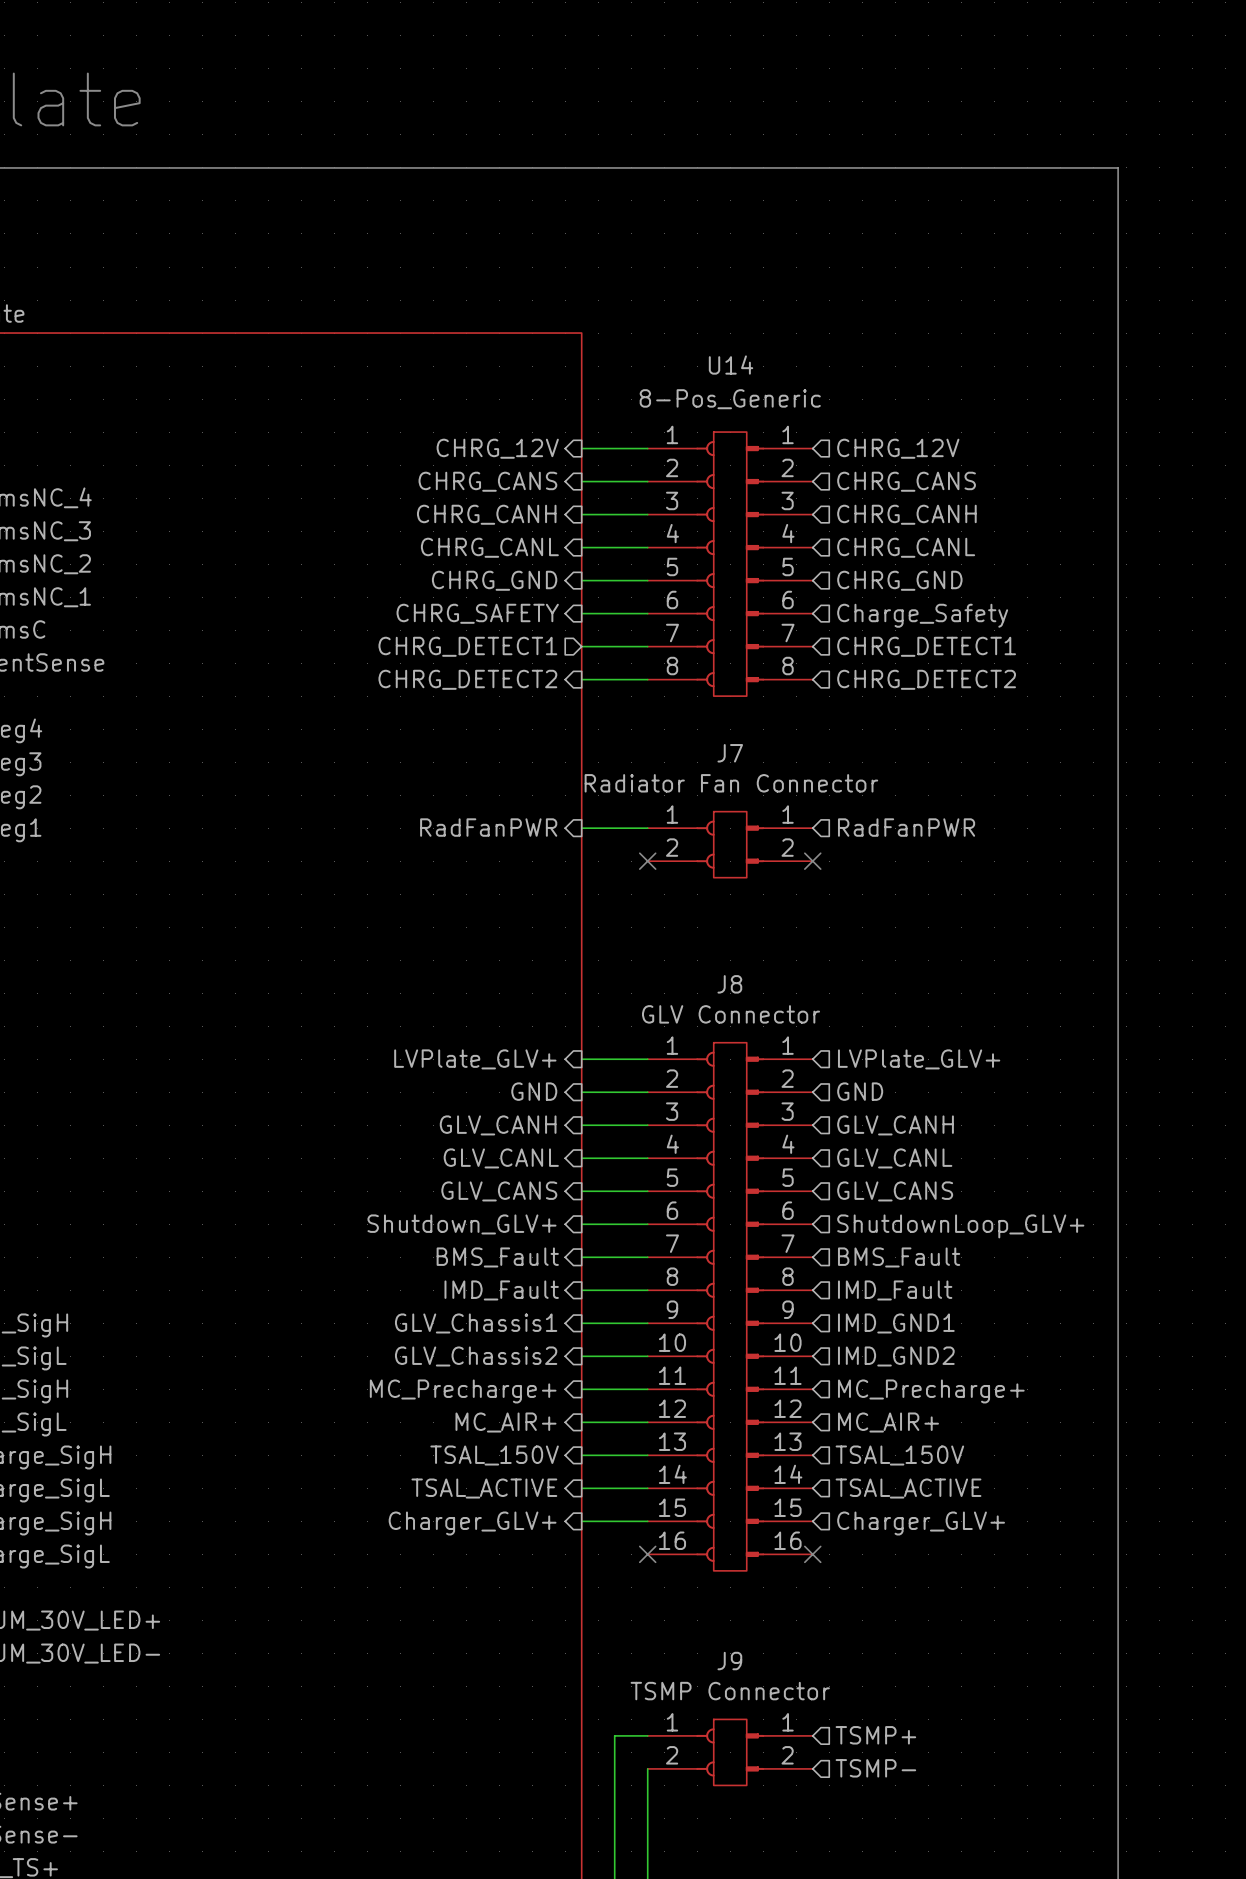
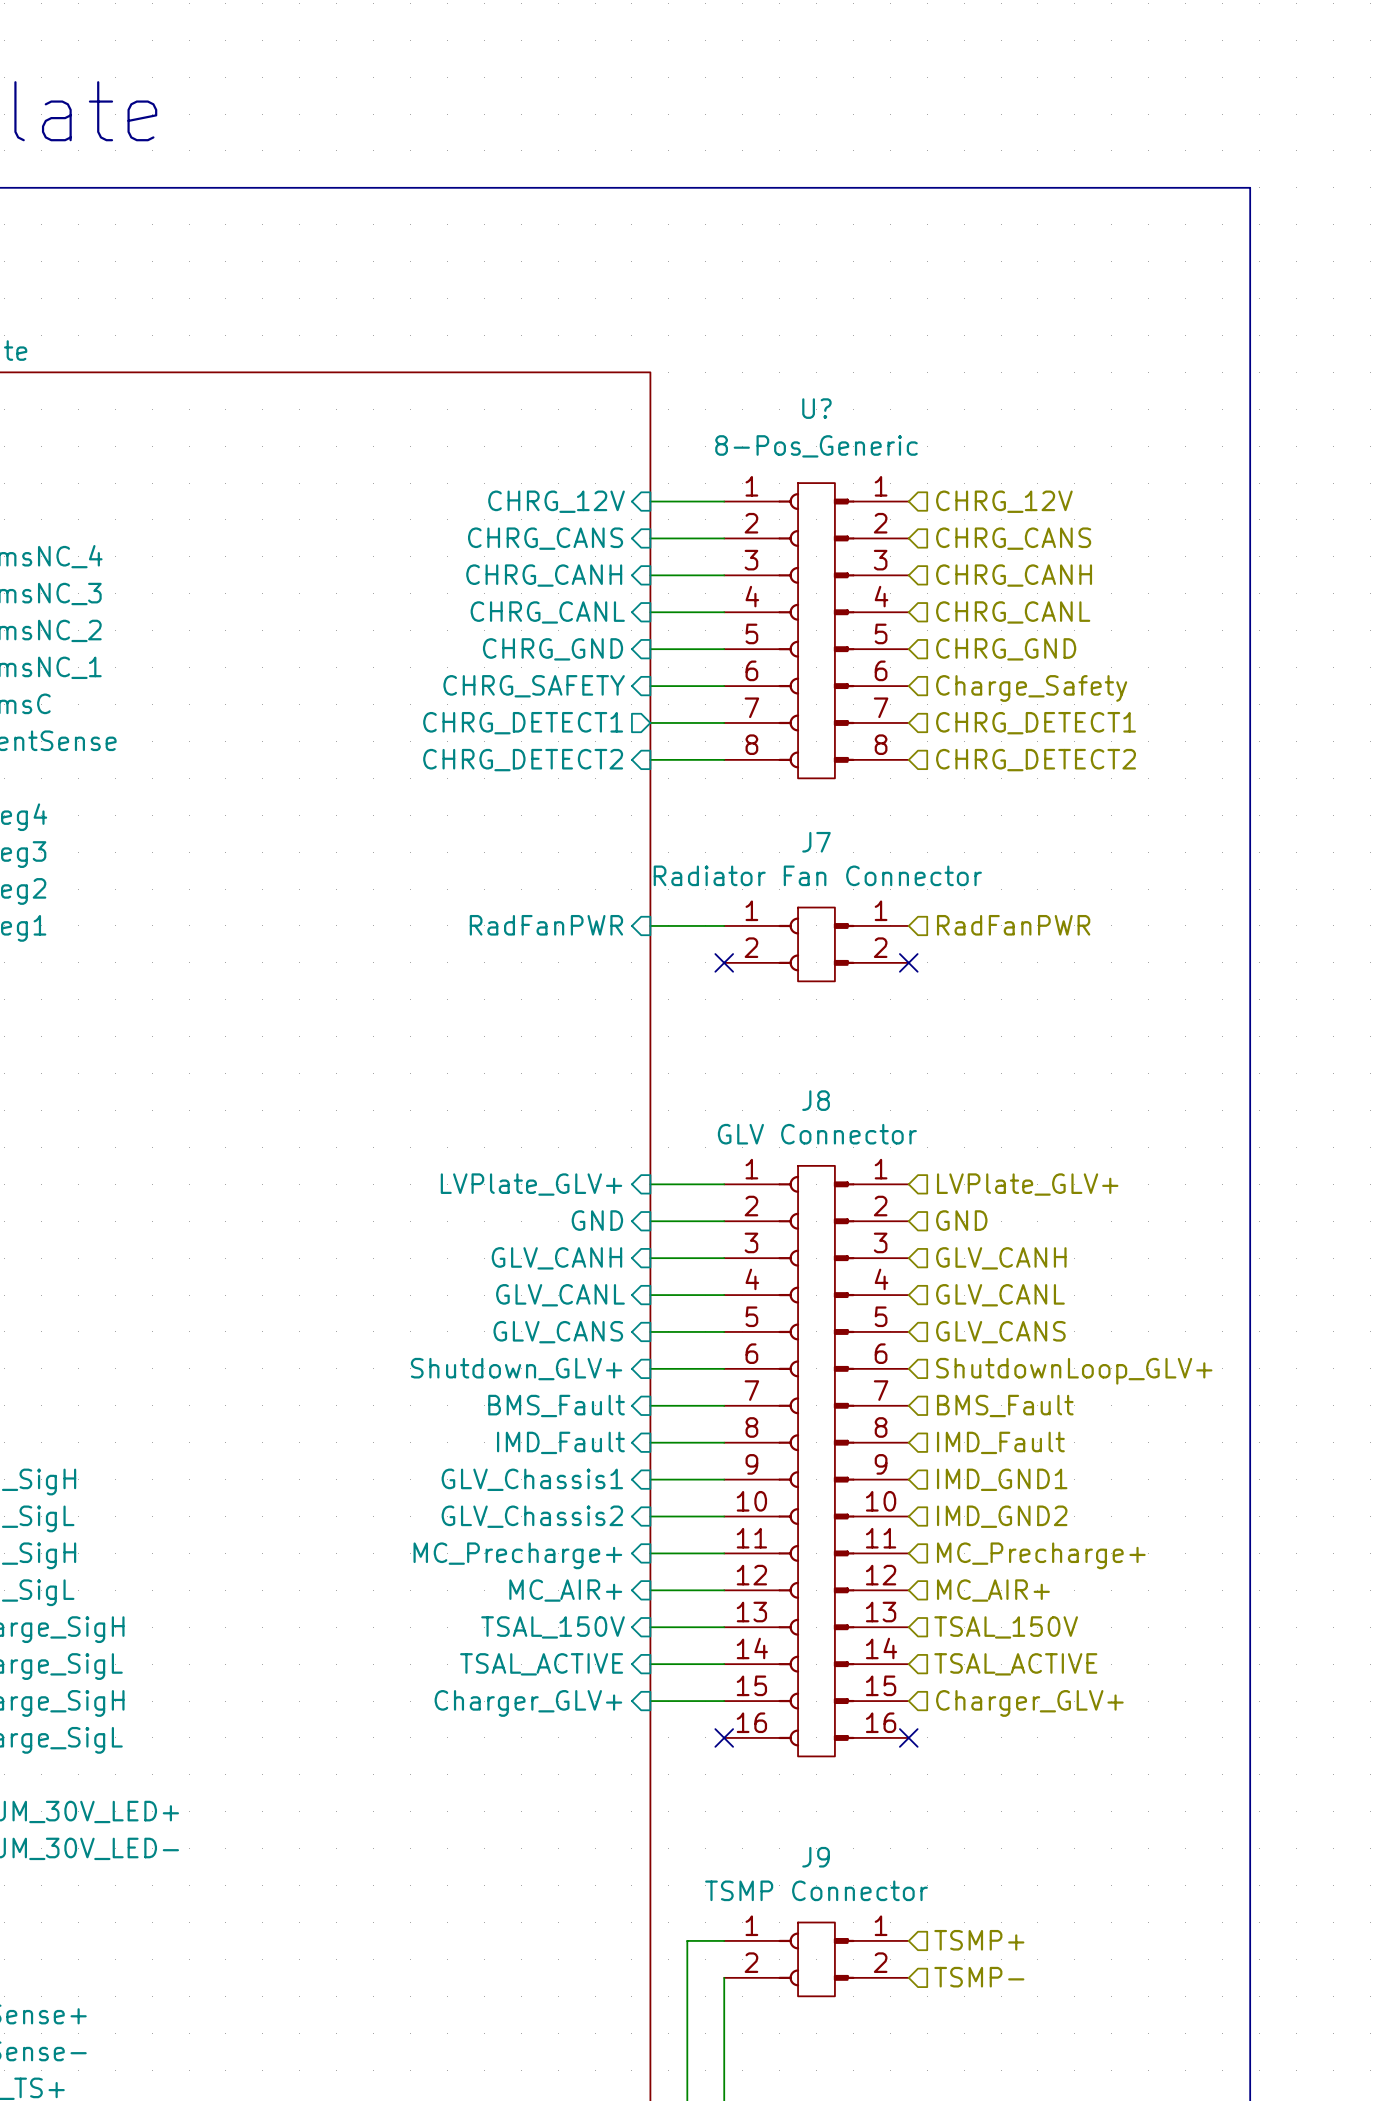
U14 name: U14 (731, 365) -> U? (816, 408)

